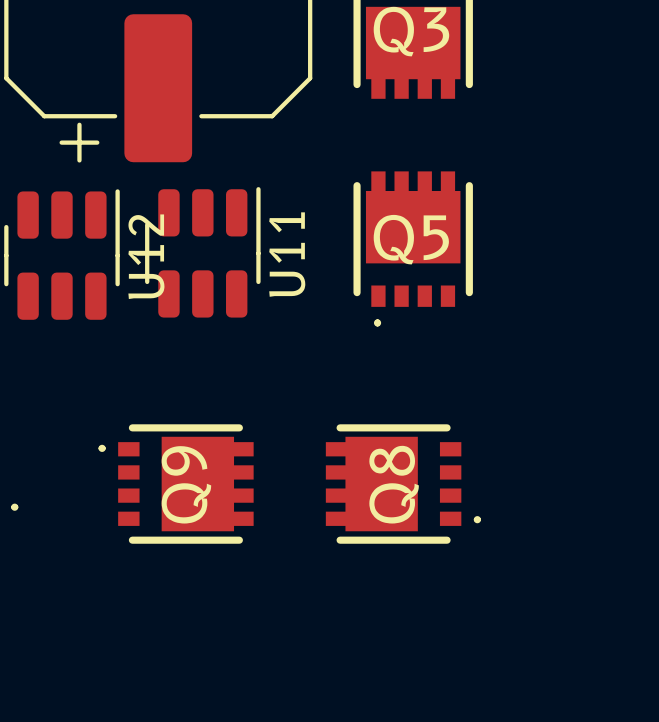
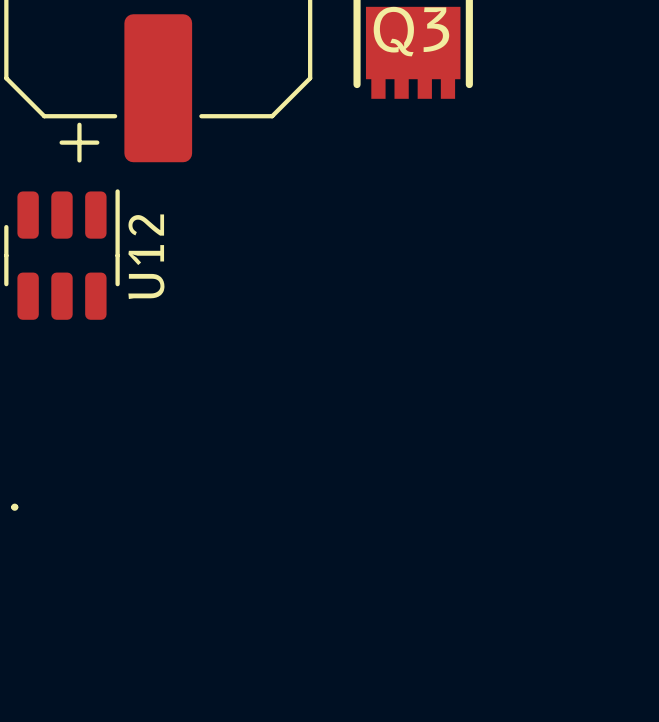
Q5: (413, 248) -> none
U11: (202, 252) -> none
Q9: (176, 484) -> none
Q8: (403, 484) -> none

